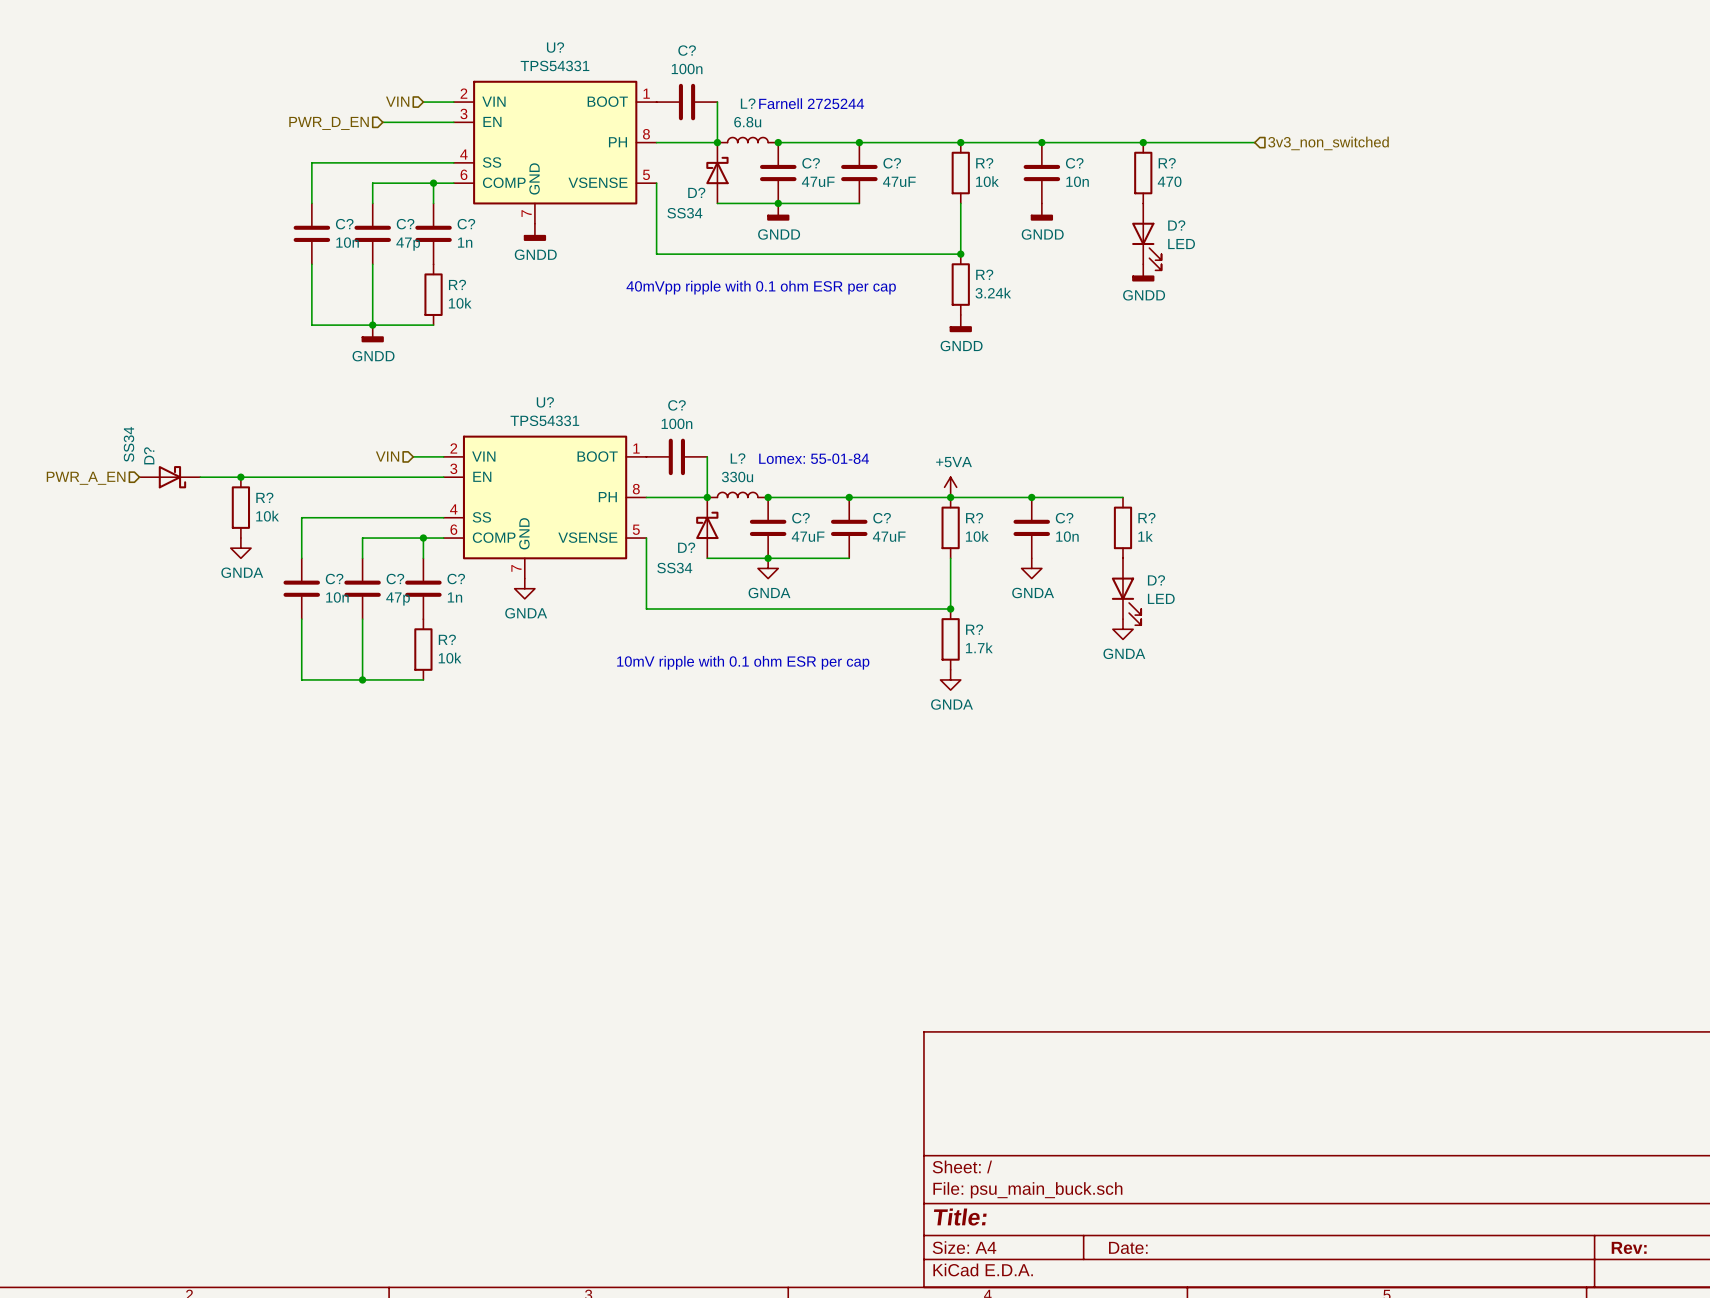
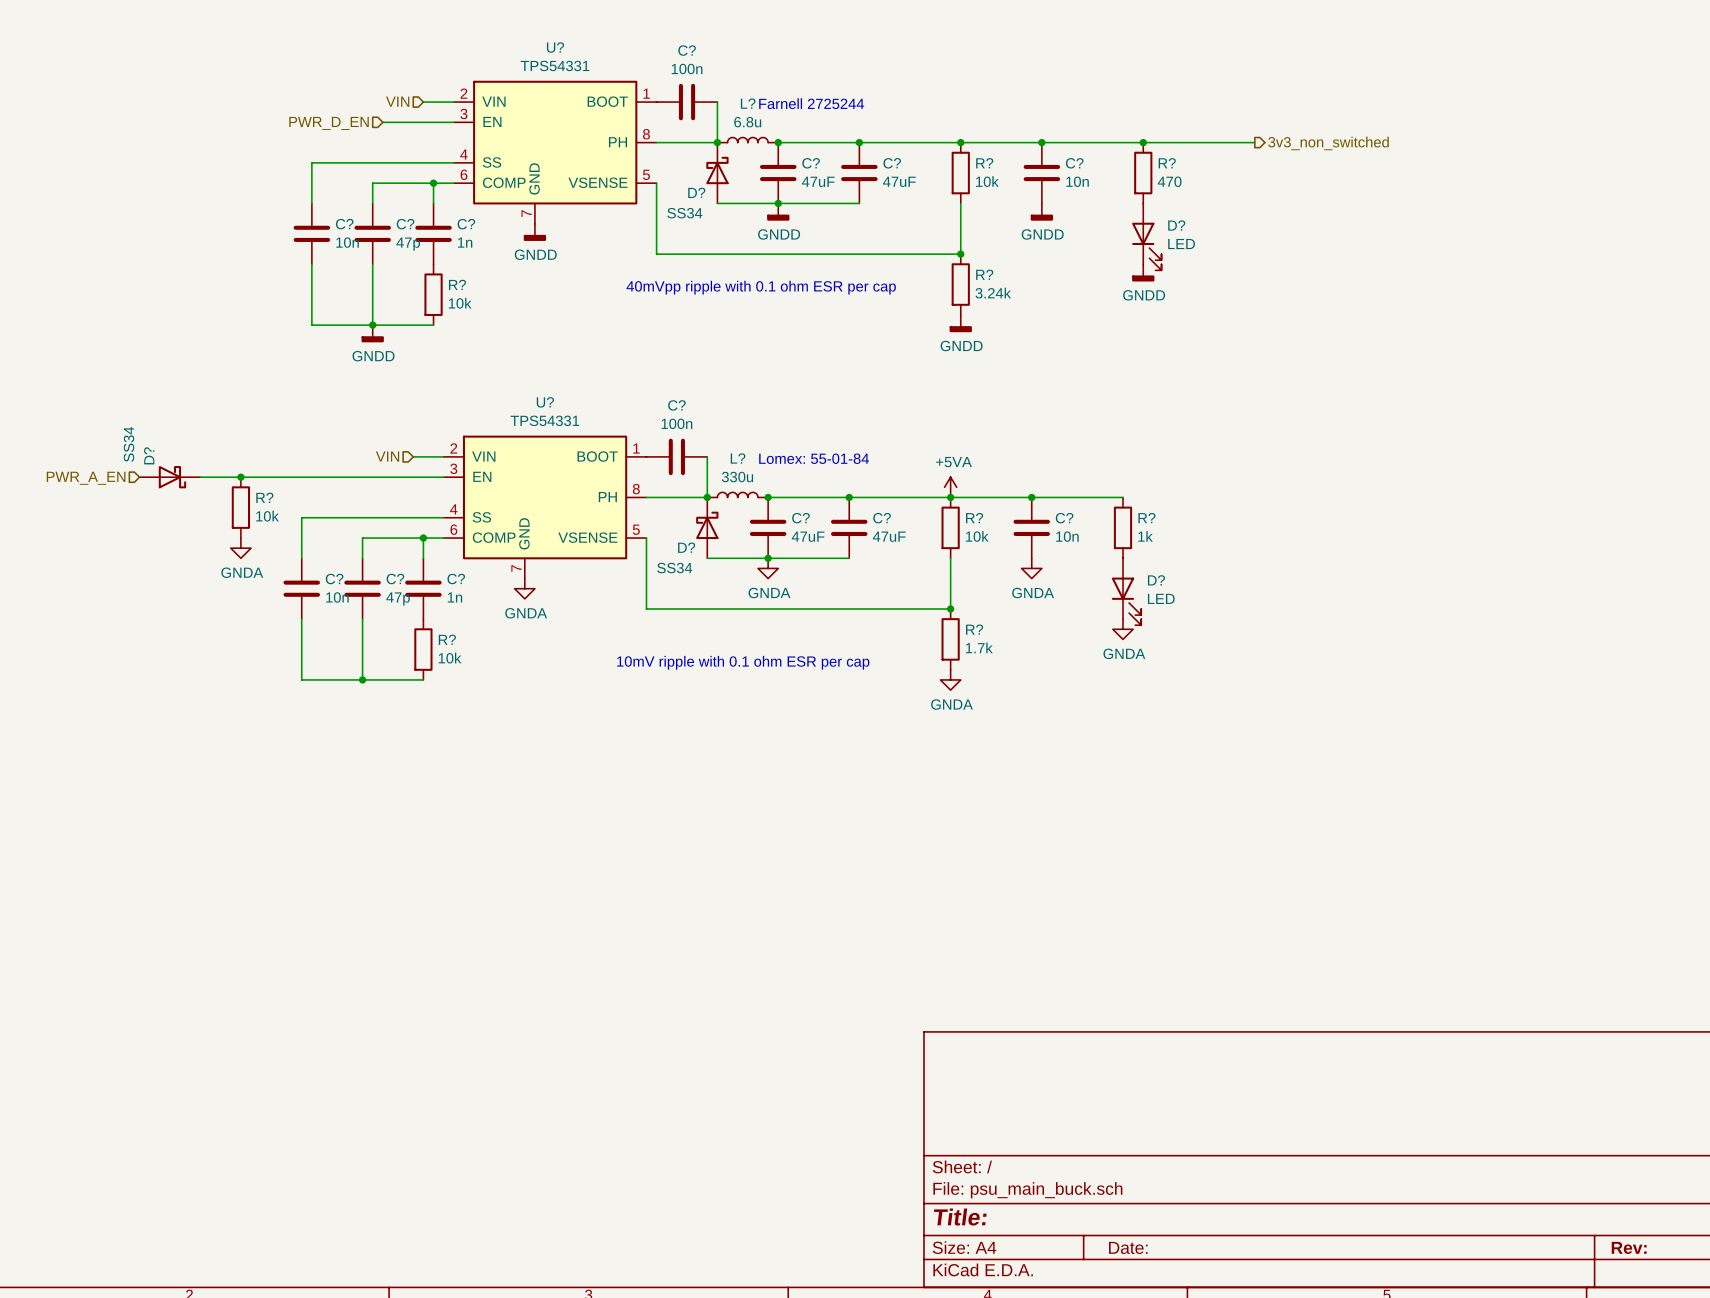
hierarchical label shape: input (1328, 143) -> output (1328, 143)

